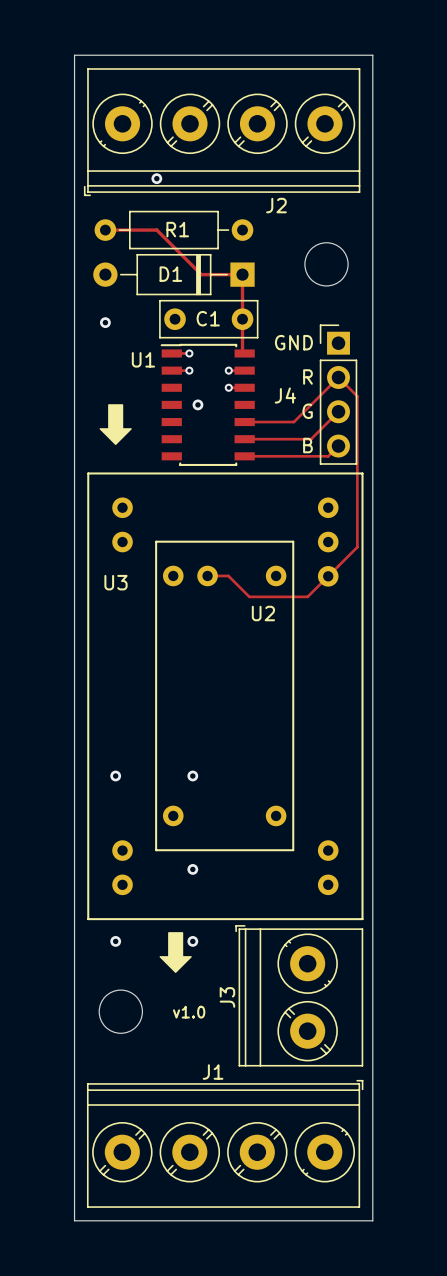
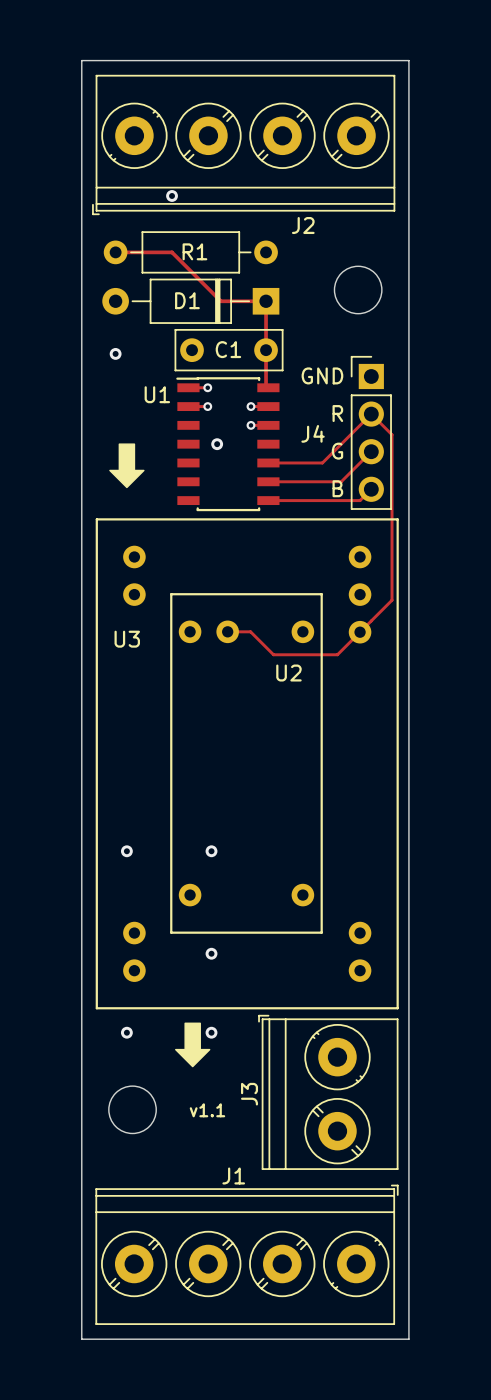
text: v1.0 (189, 1012) -> v1.1 (207, 1110)

